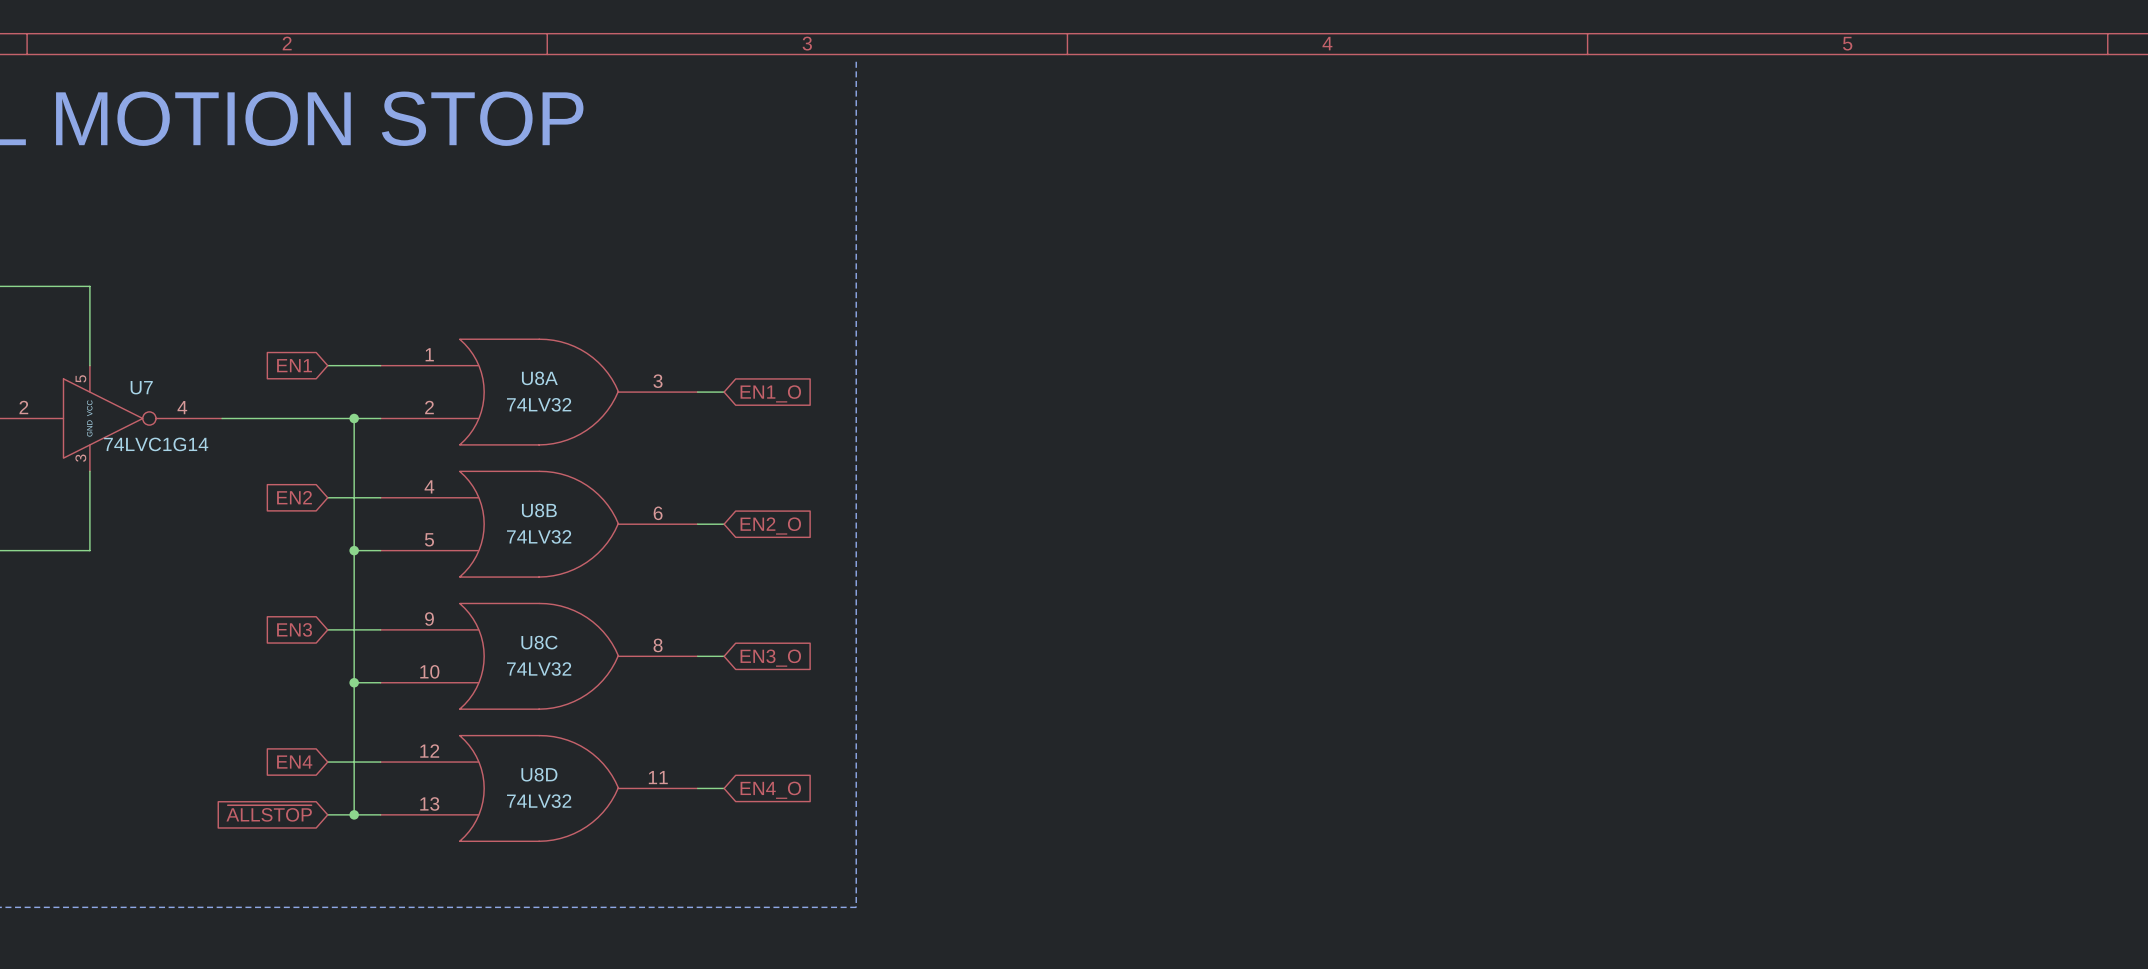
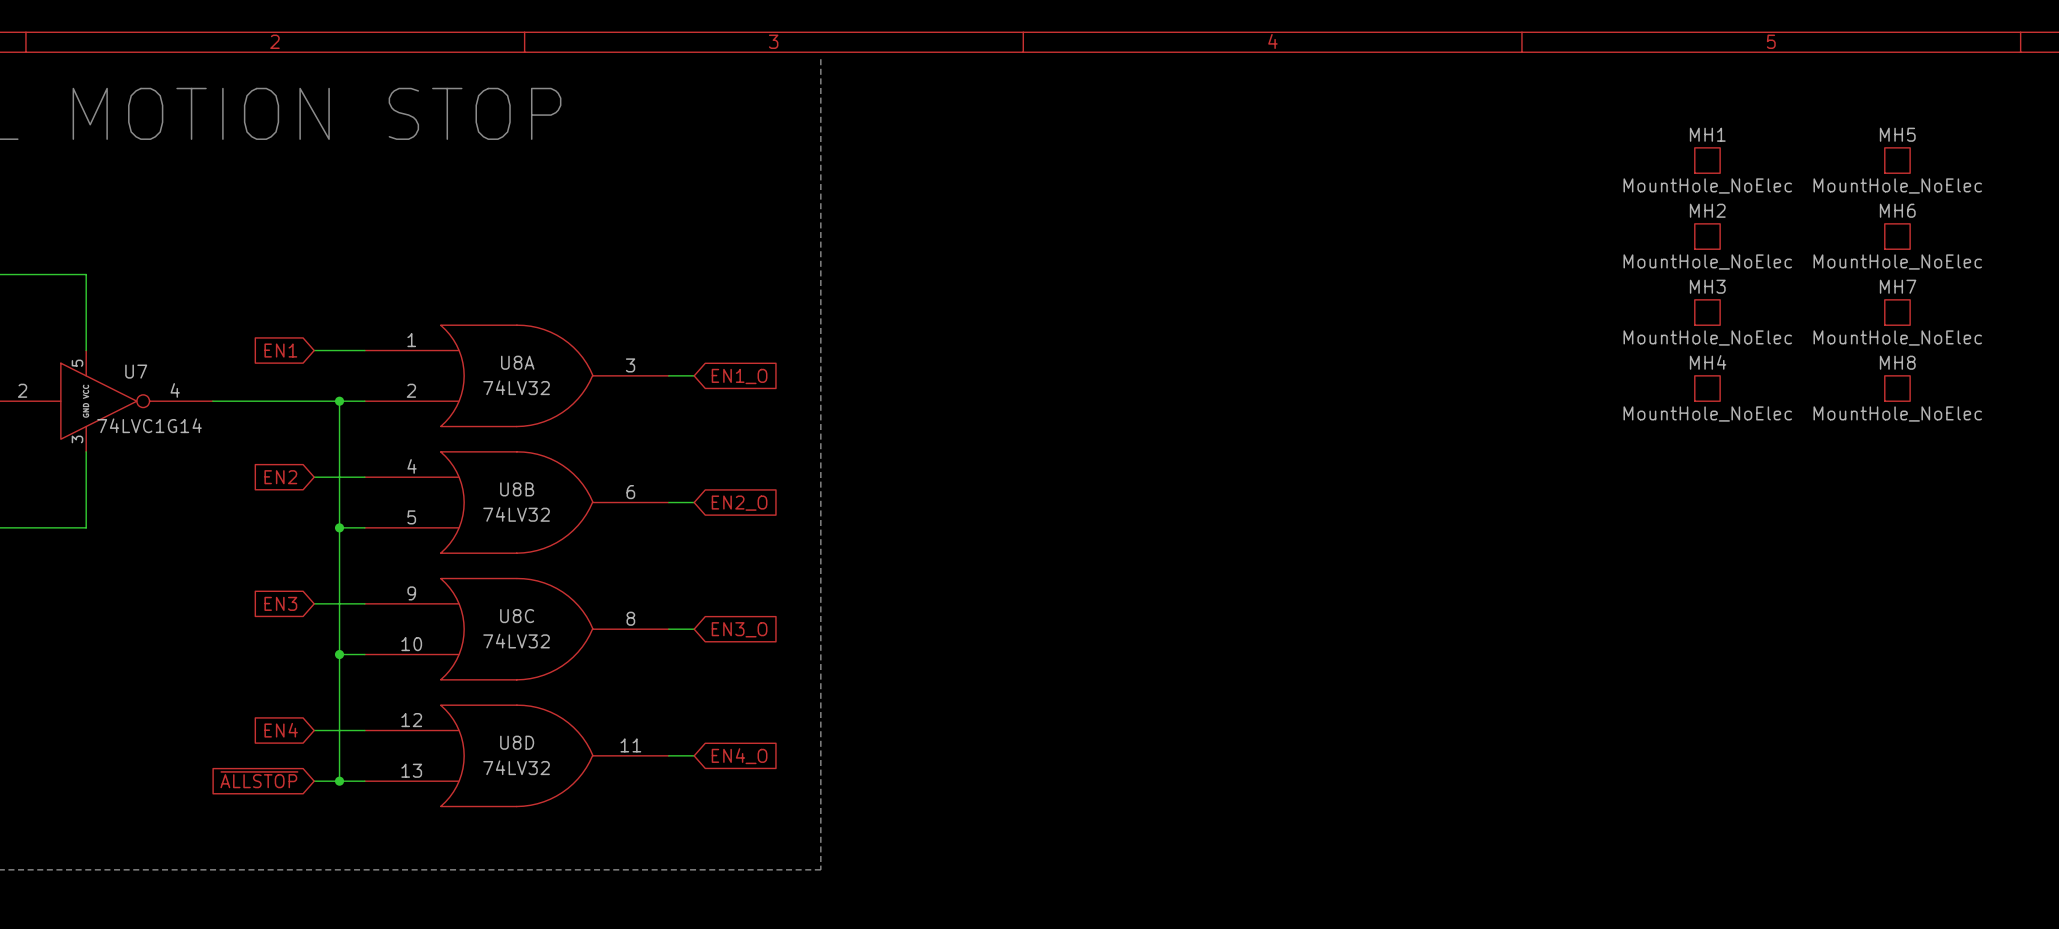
MH1: none -> MountHole_NoElec (1707, 160)
MH5: none -> MountHole_NoElec (1897, 160)
MH2: none -> MountHole_NoElec (1707, 236)
MH6: none -> MountHole_NoElec (1897, 236)
MH3: none -> MountHole_NoElec (1707, 312)
MH7: none -> MountHole_NoElec (1897, 312)
MH4: none -> MountHole_NoElec (1707, 388)
MH8: none -> MountHole_NoElec (1897, 388)

